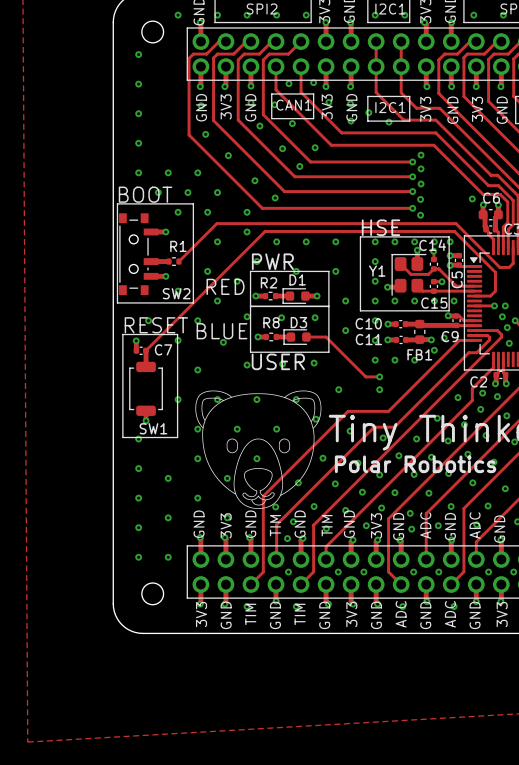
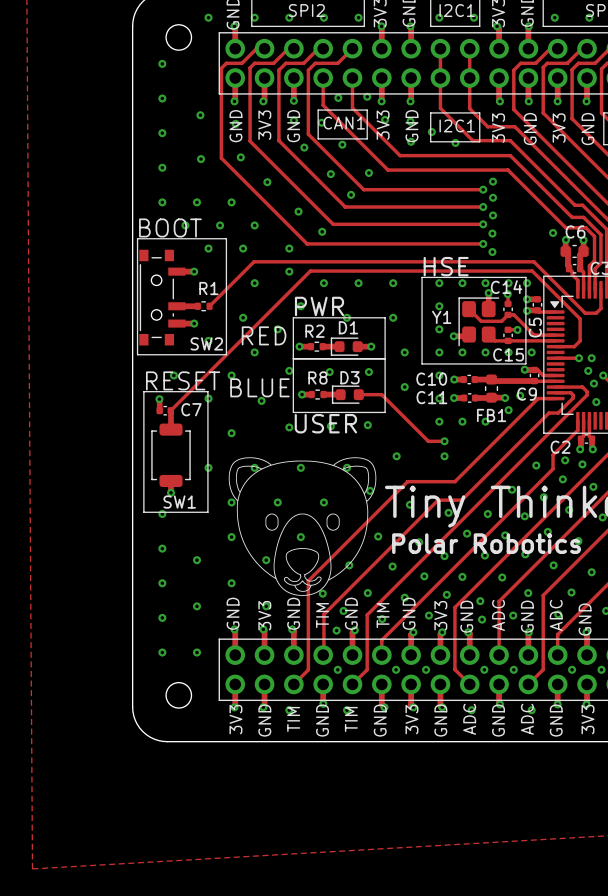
via: none -> (200, 115)
via: none -> (201, 159)

